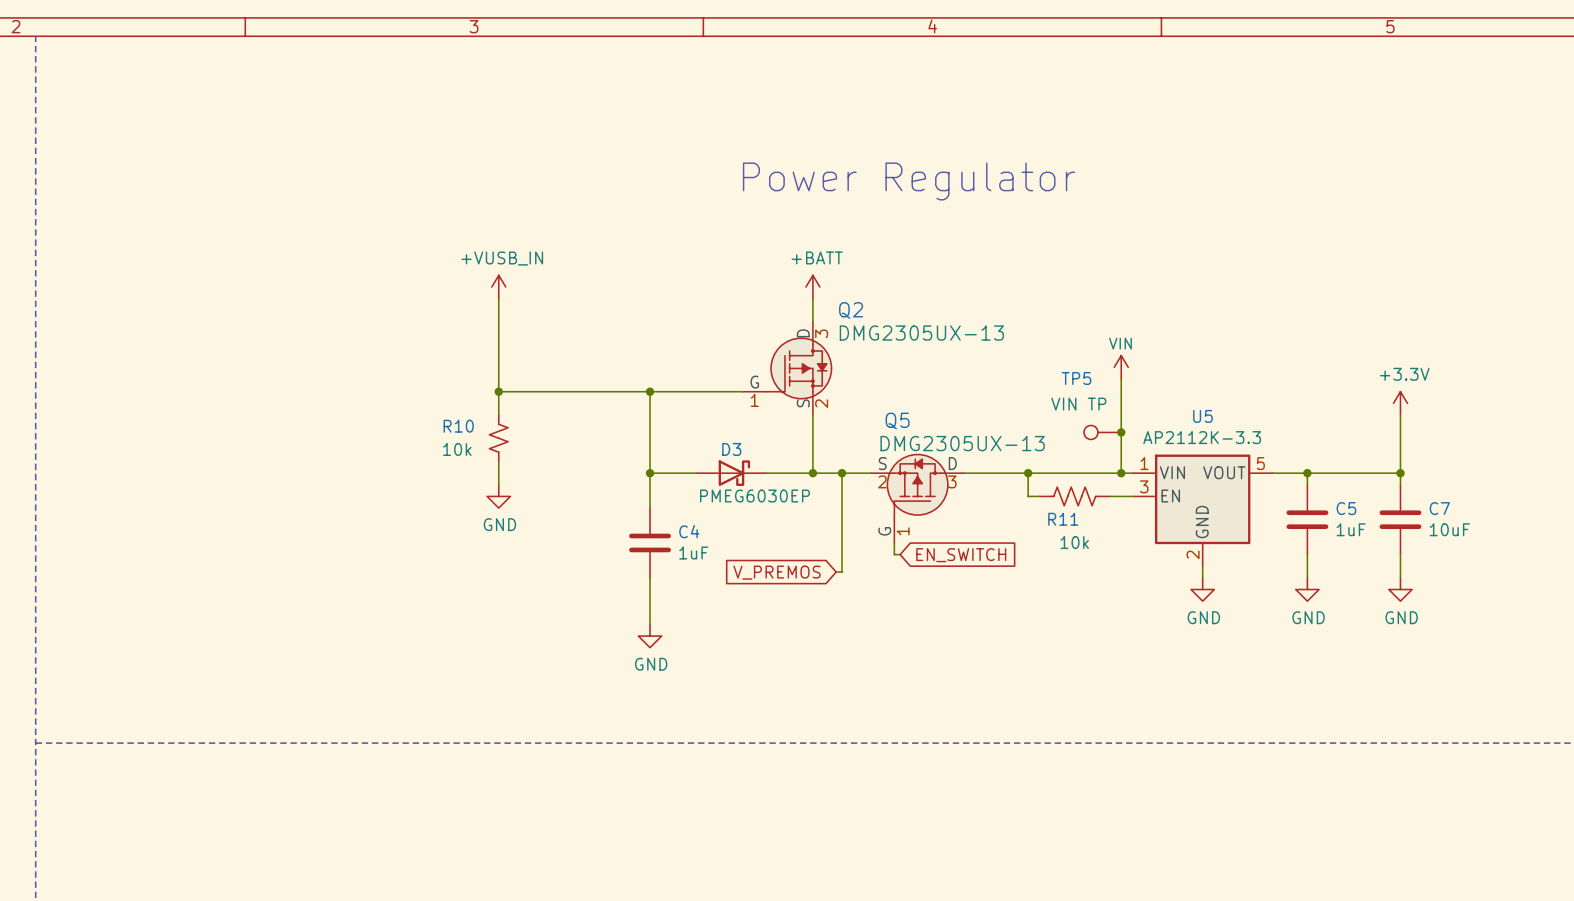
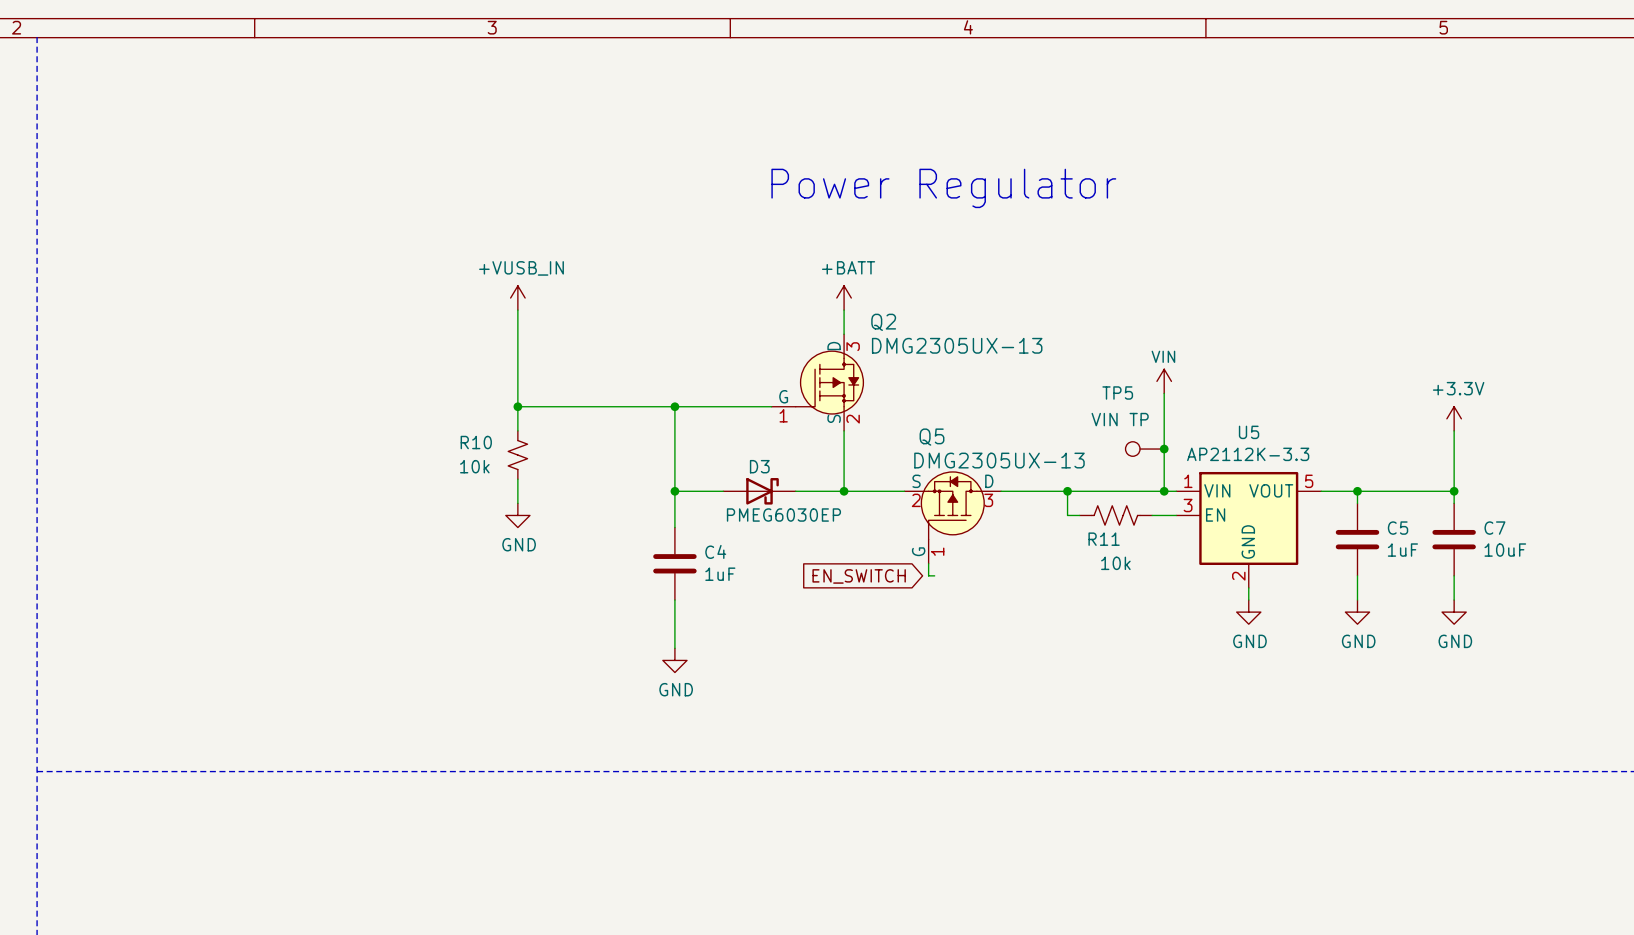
wire: (842, 473) (842, 572) (836, 572) -> none
junction: (842, 473) -> none
global label rotation: 0° (961, 555) -> 180° (859, 576)
global label position: EN_SWITCH (961, 555) -> EN_SWITCH (859, 576)
global label: V_PREMOS (777, 572) -> none

